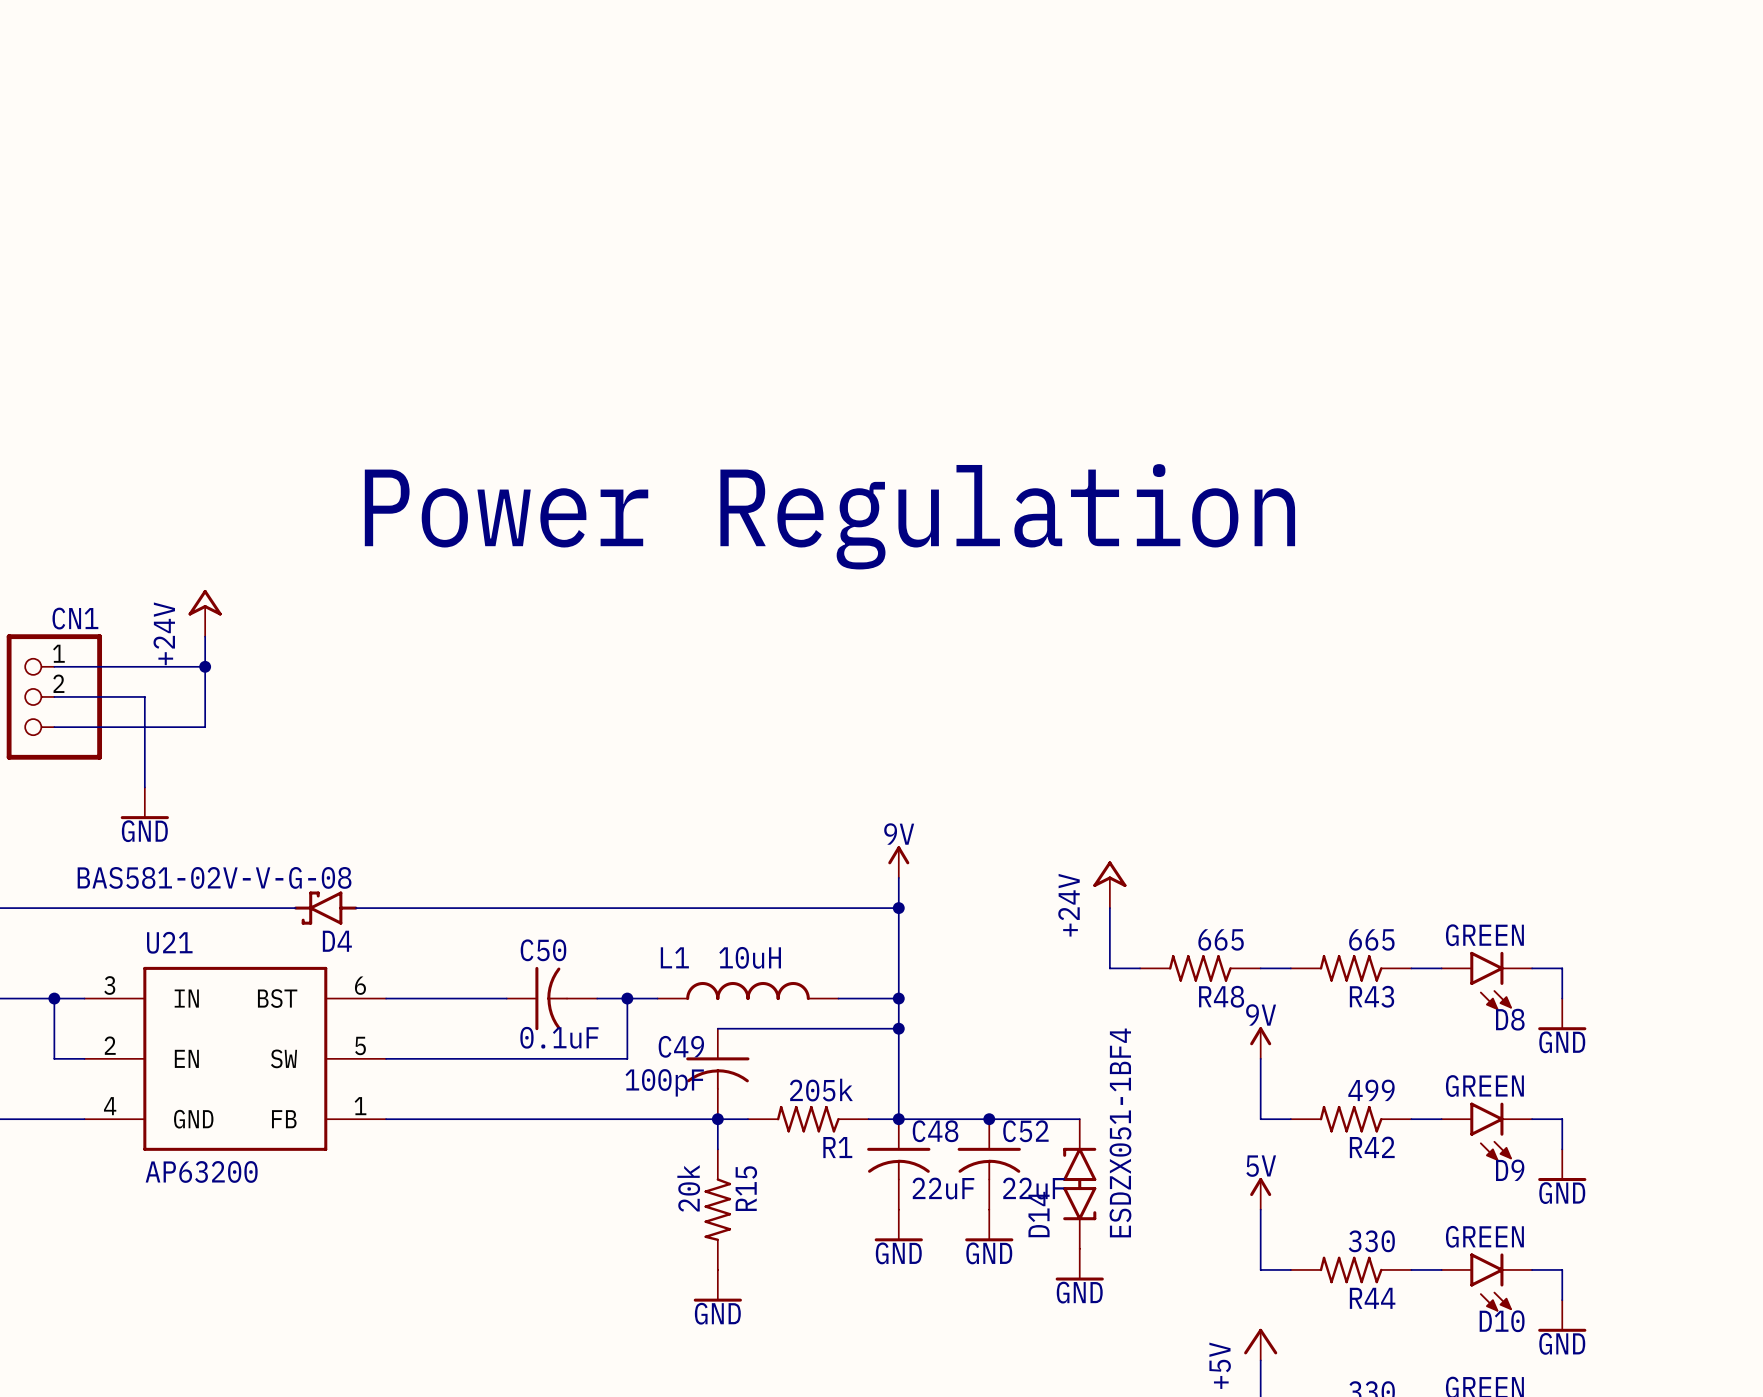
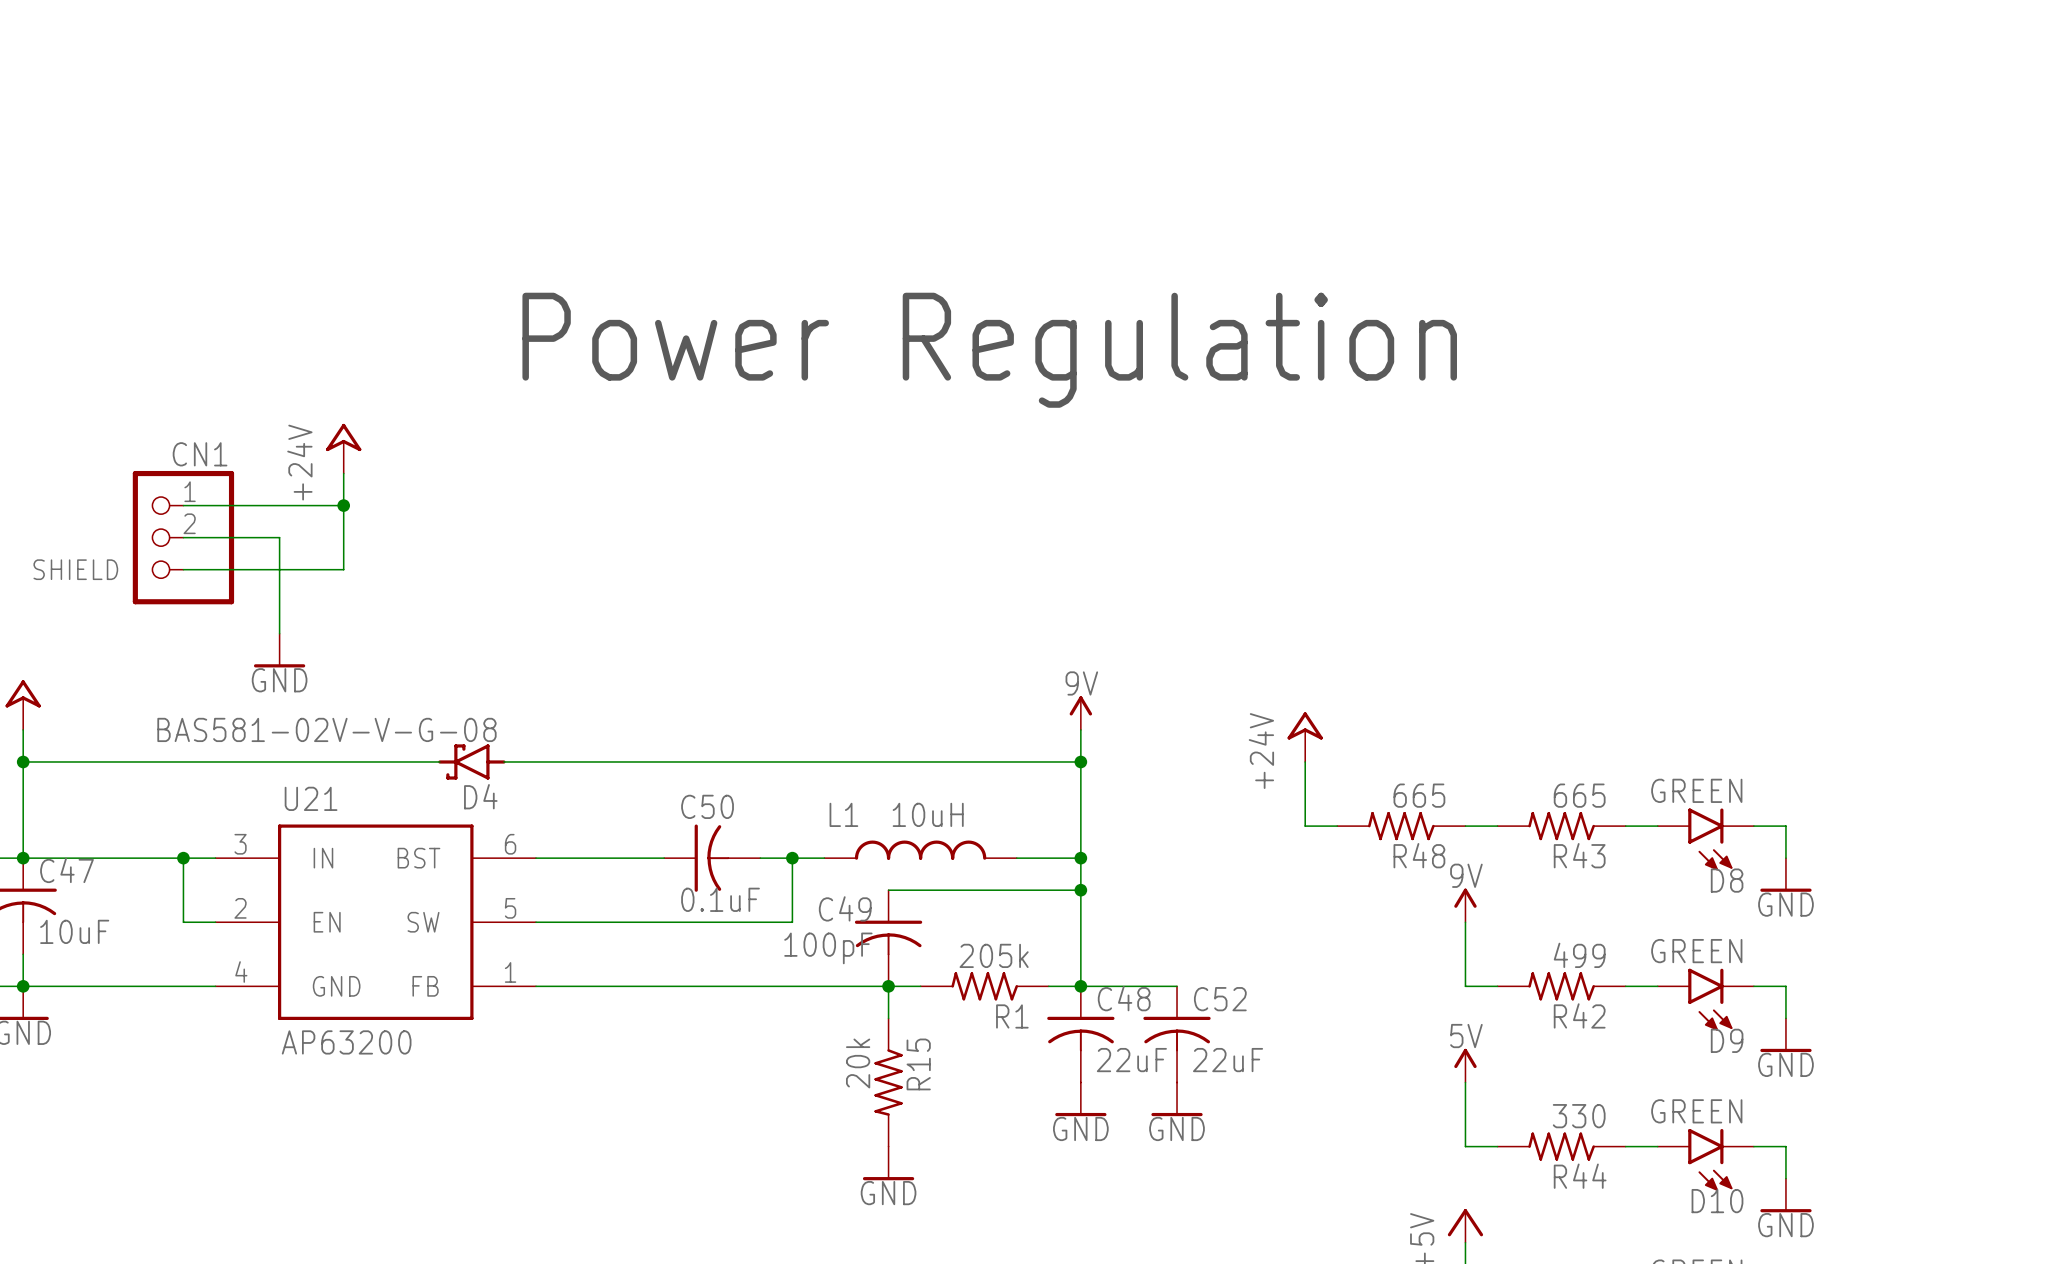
wire: (989, 1119) (1079, 1119) -> none
junction: (989, 1119) -> none
D14: ESDZX051-1BF4 (1079, 1184) -> none
power symbol: GND (1079, 1264) -> none

